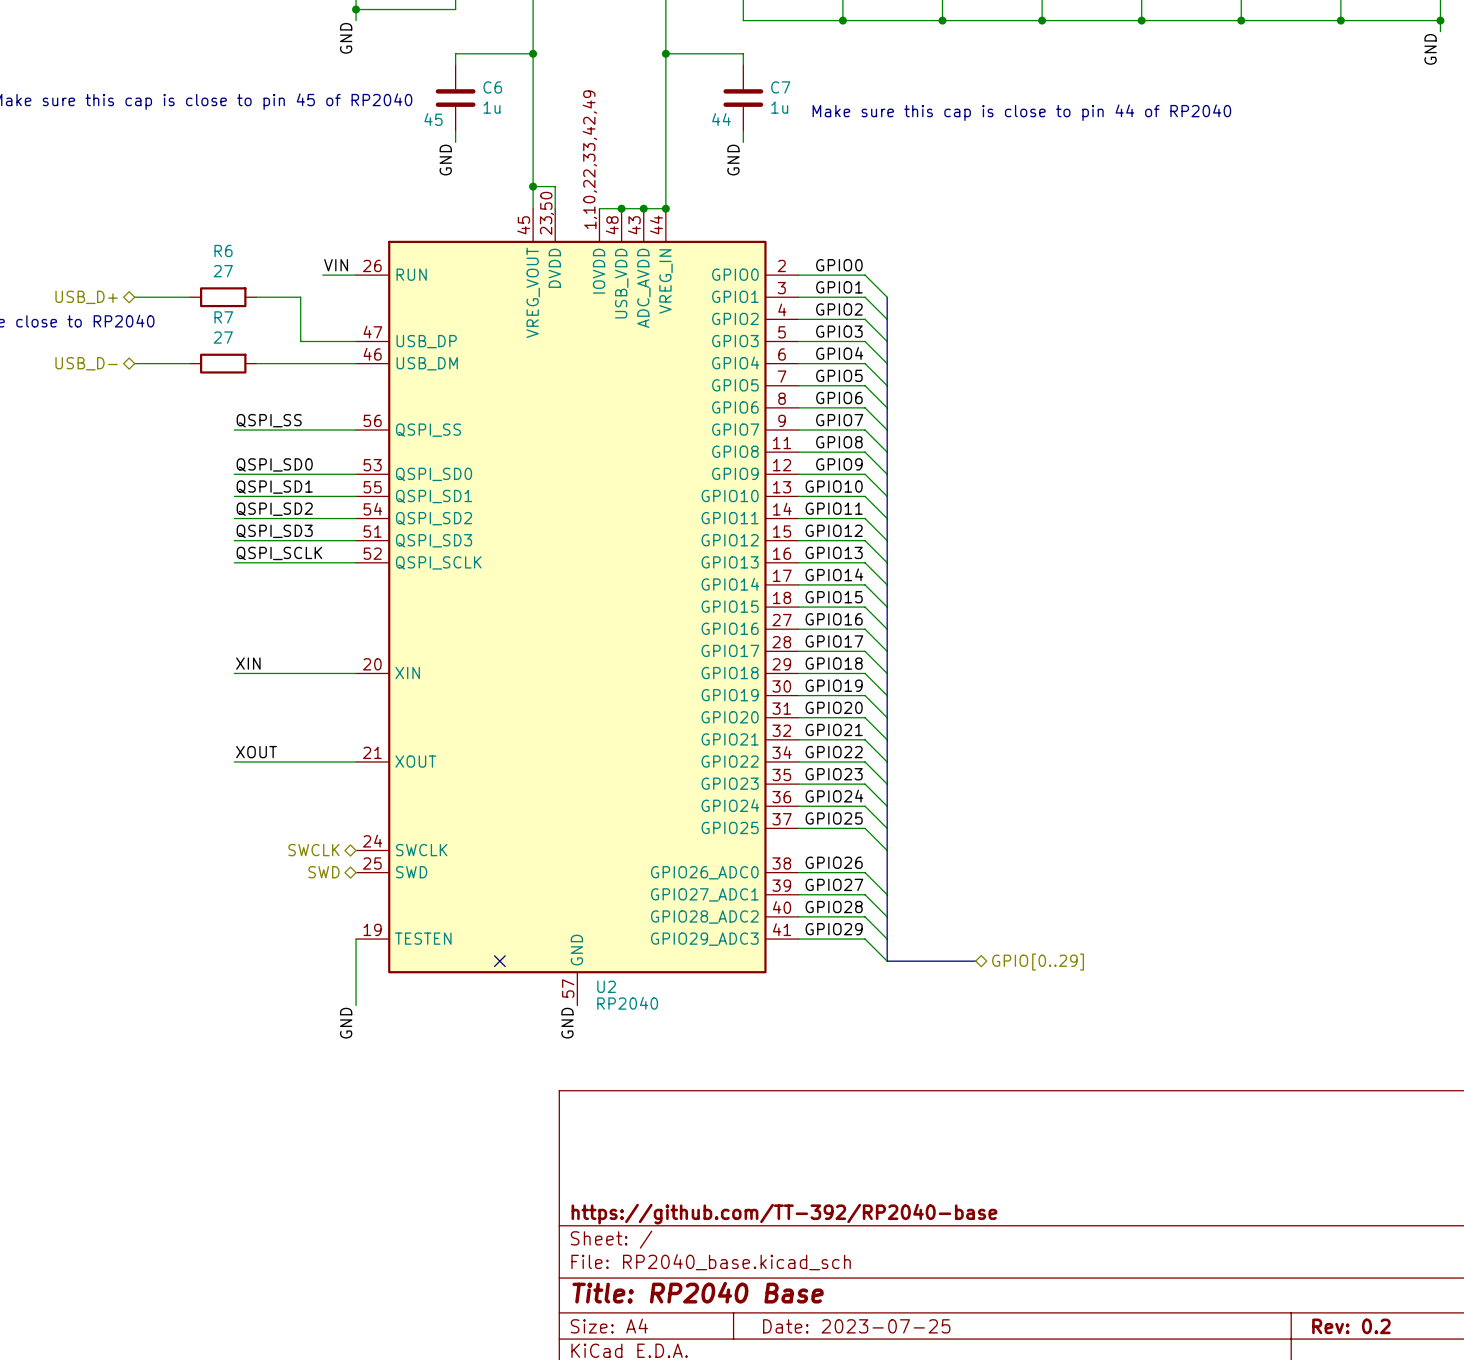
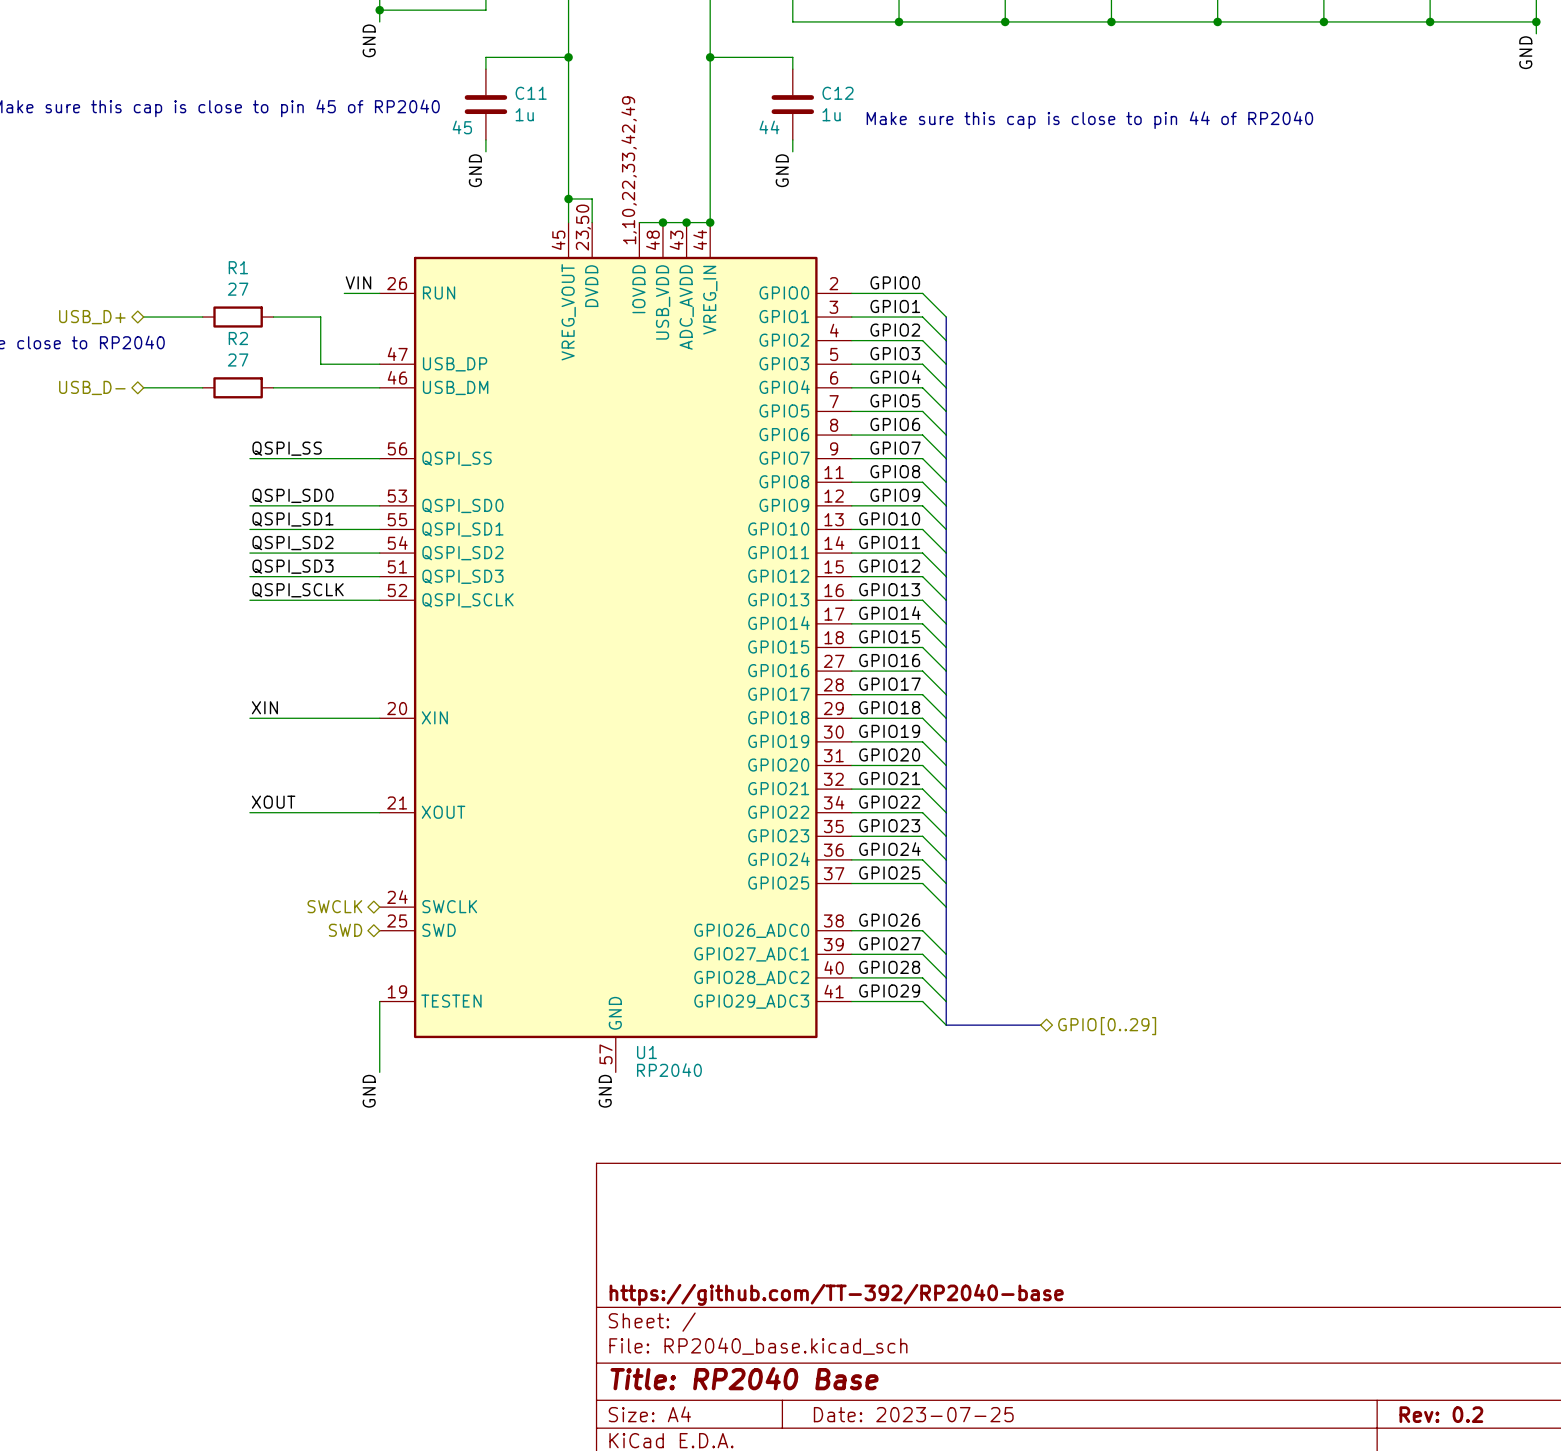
C6 name: C6 (492, 87) -> C11 (531, 93)
C7 name: C7 (780, 87) -> C12 (838, 93)
R6 name: R6 (223, 251) -> R1 (238, 267)
R7 name: R7 (223, 317) -> R2 (238, 338)
no-connect mark: (499, 961) -> none
U2 name: U2 (606, 986) -> U1 (646, 1052)

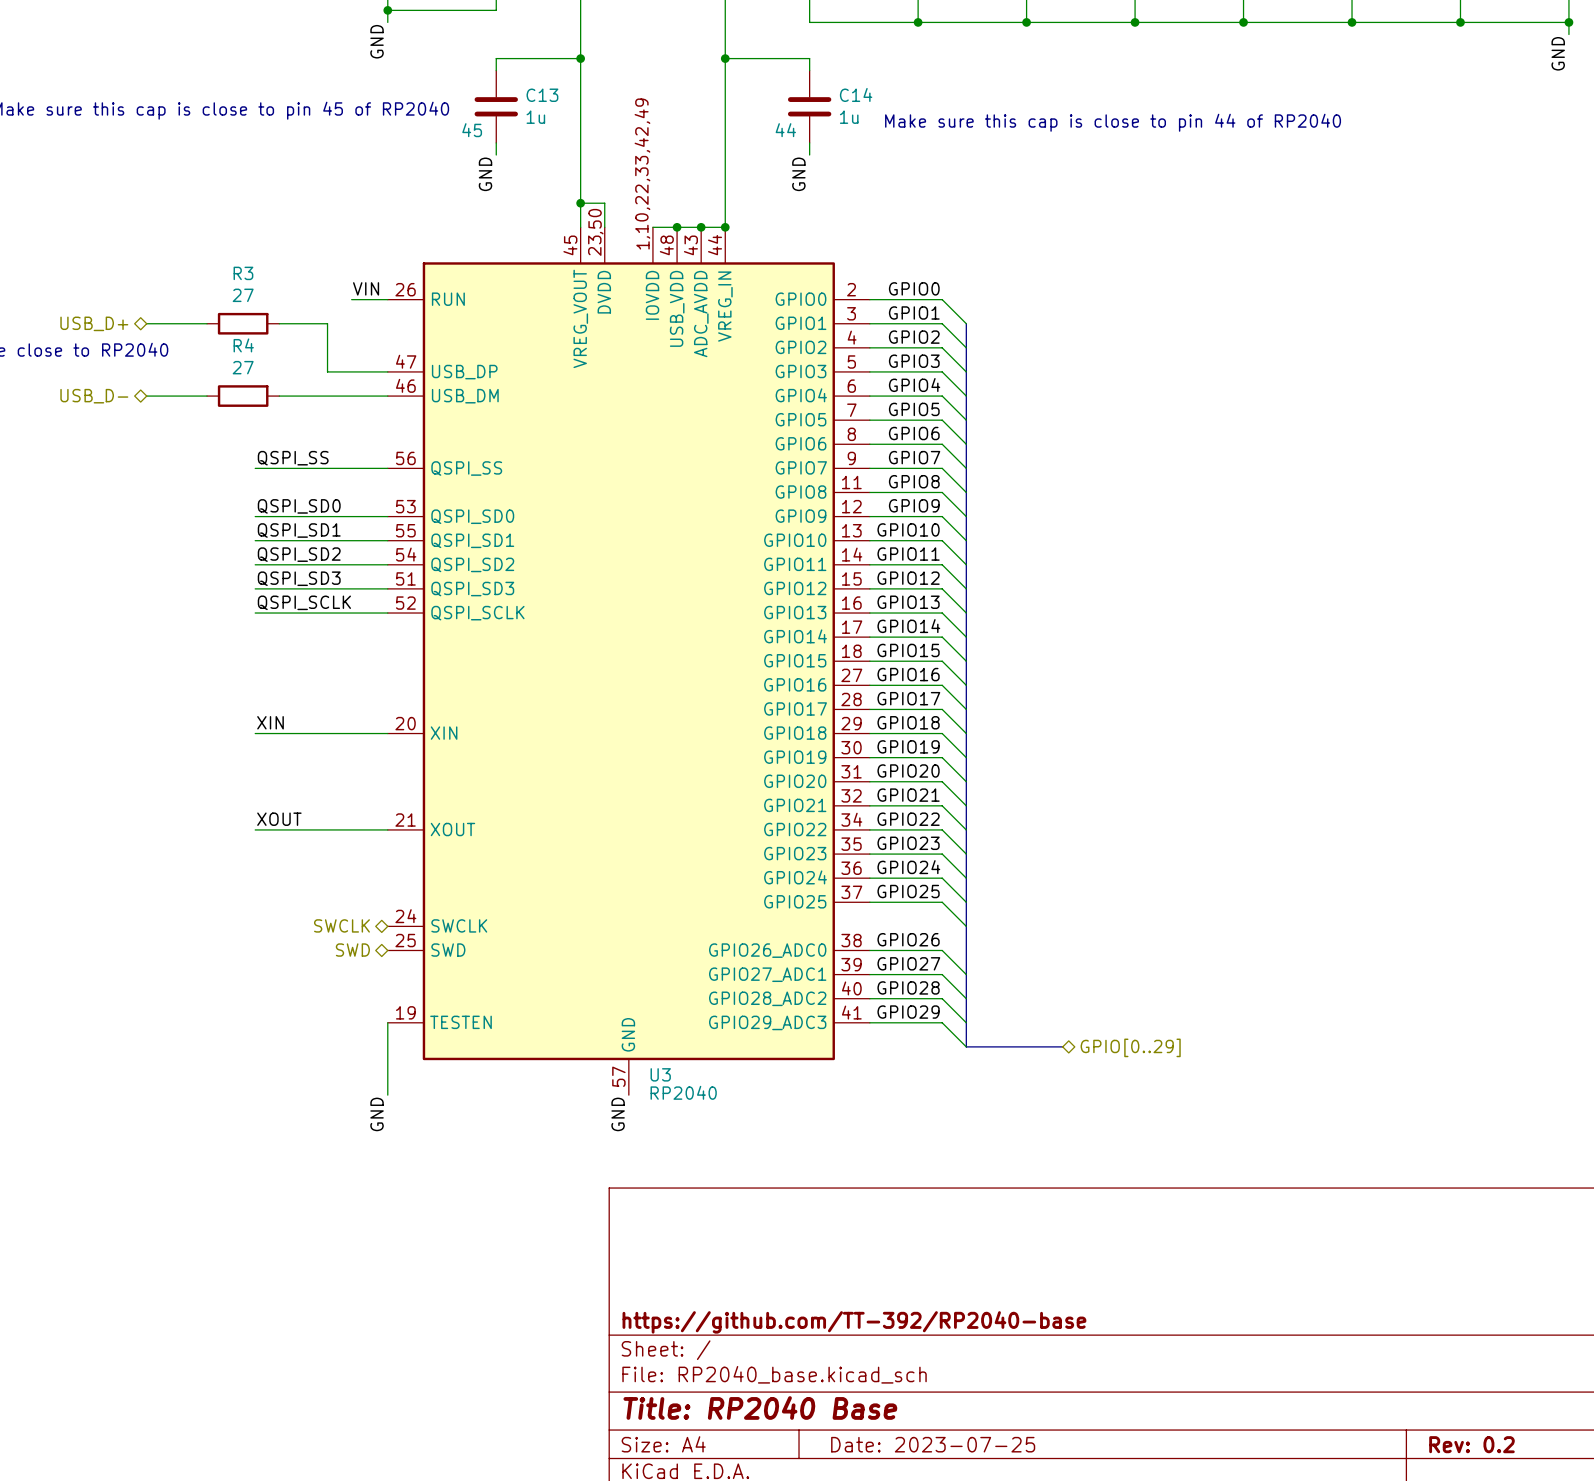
C11 name: C11 (531, 93) -> C13 (542, 95)
C12 name: C12 (838, 93) -> C14 (856, 94)
R1 name: R1 (238, 267) -> R3 (243, 273)
R2 name: R2 (238, 338) -> R4 (243, 345)
U1 name: U1 (646, 1052) -> U3 (660, 1074)

